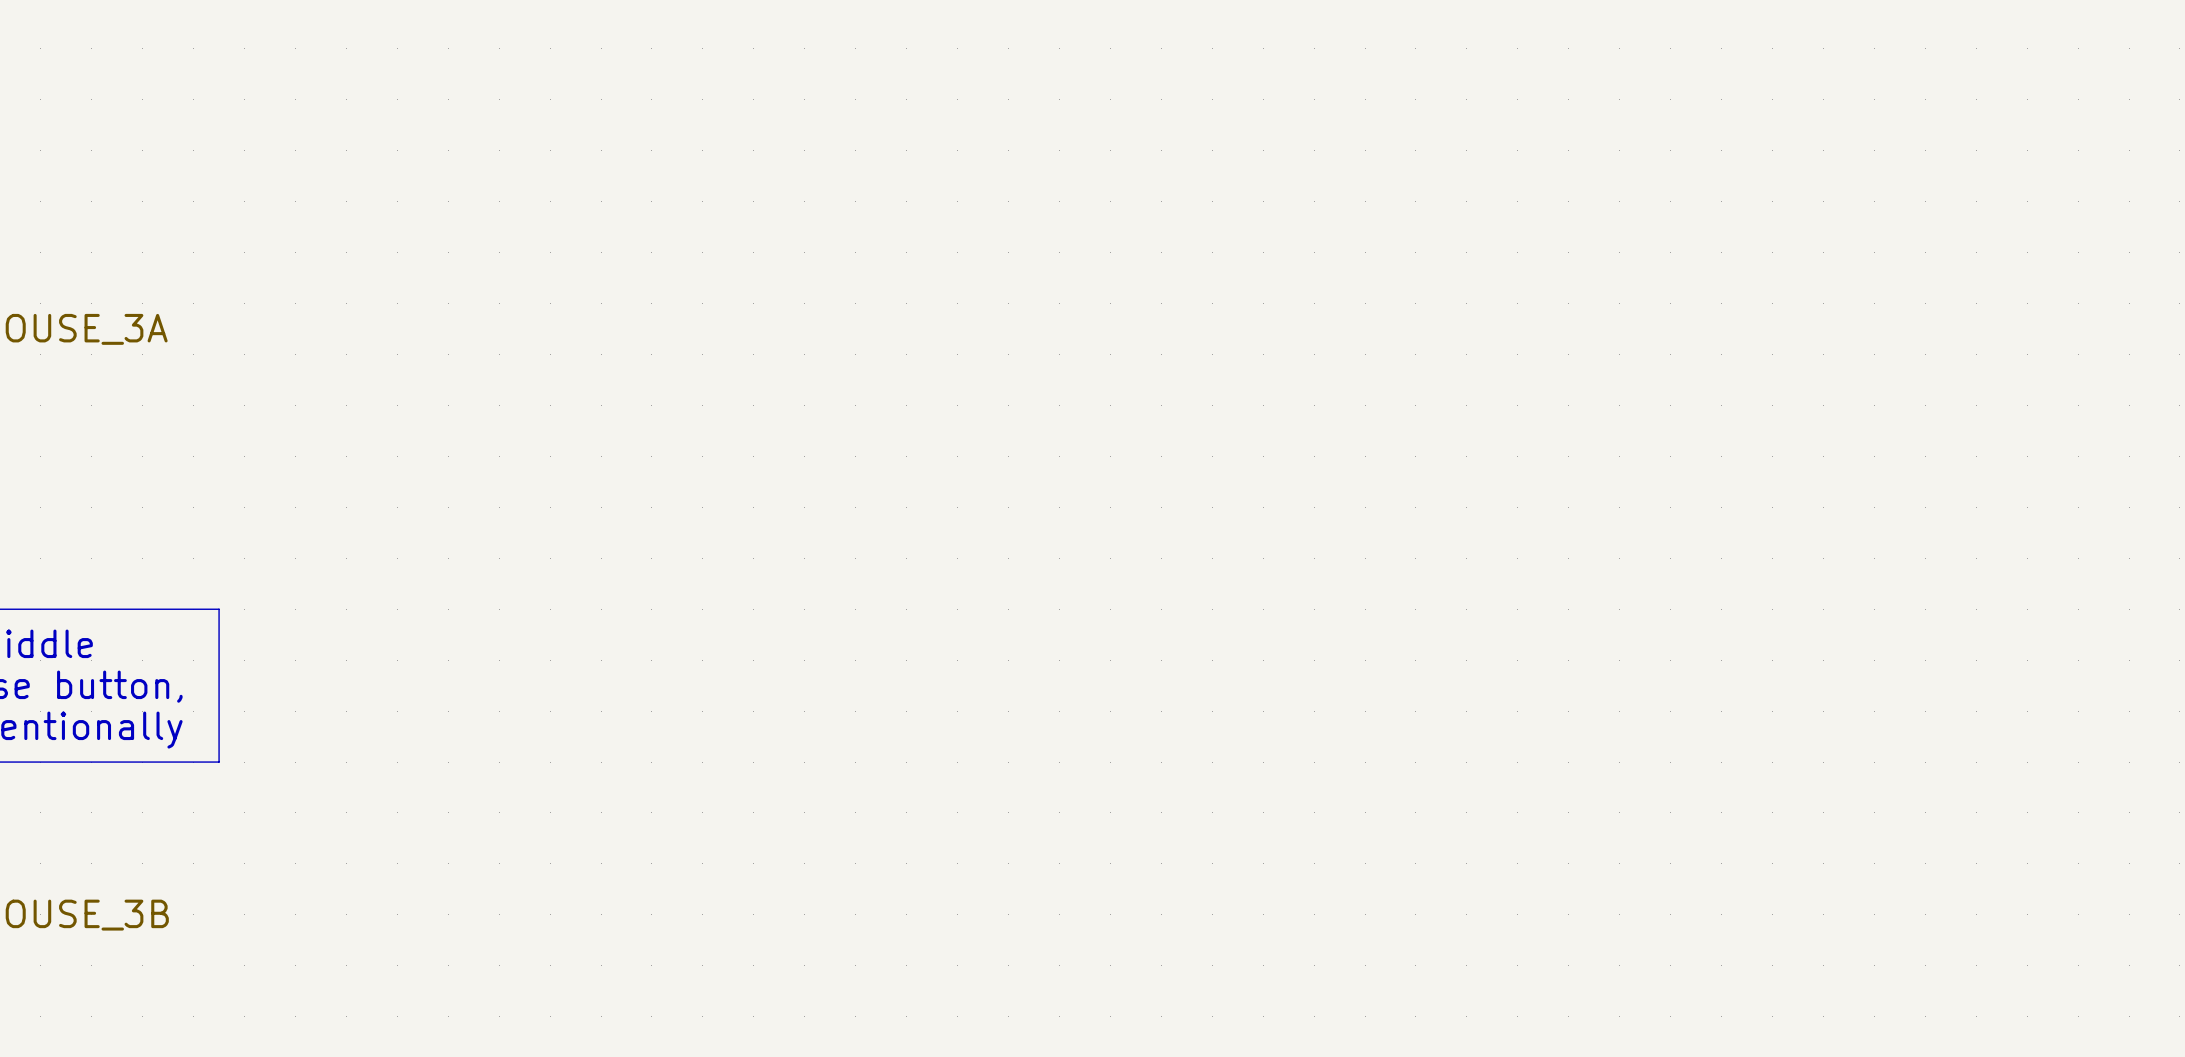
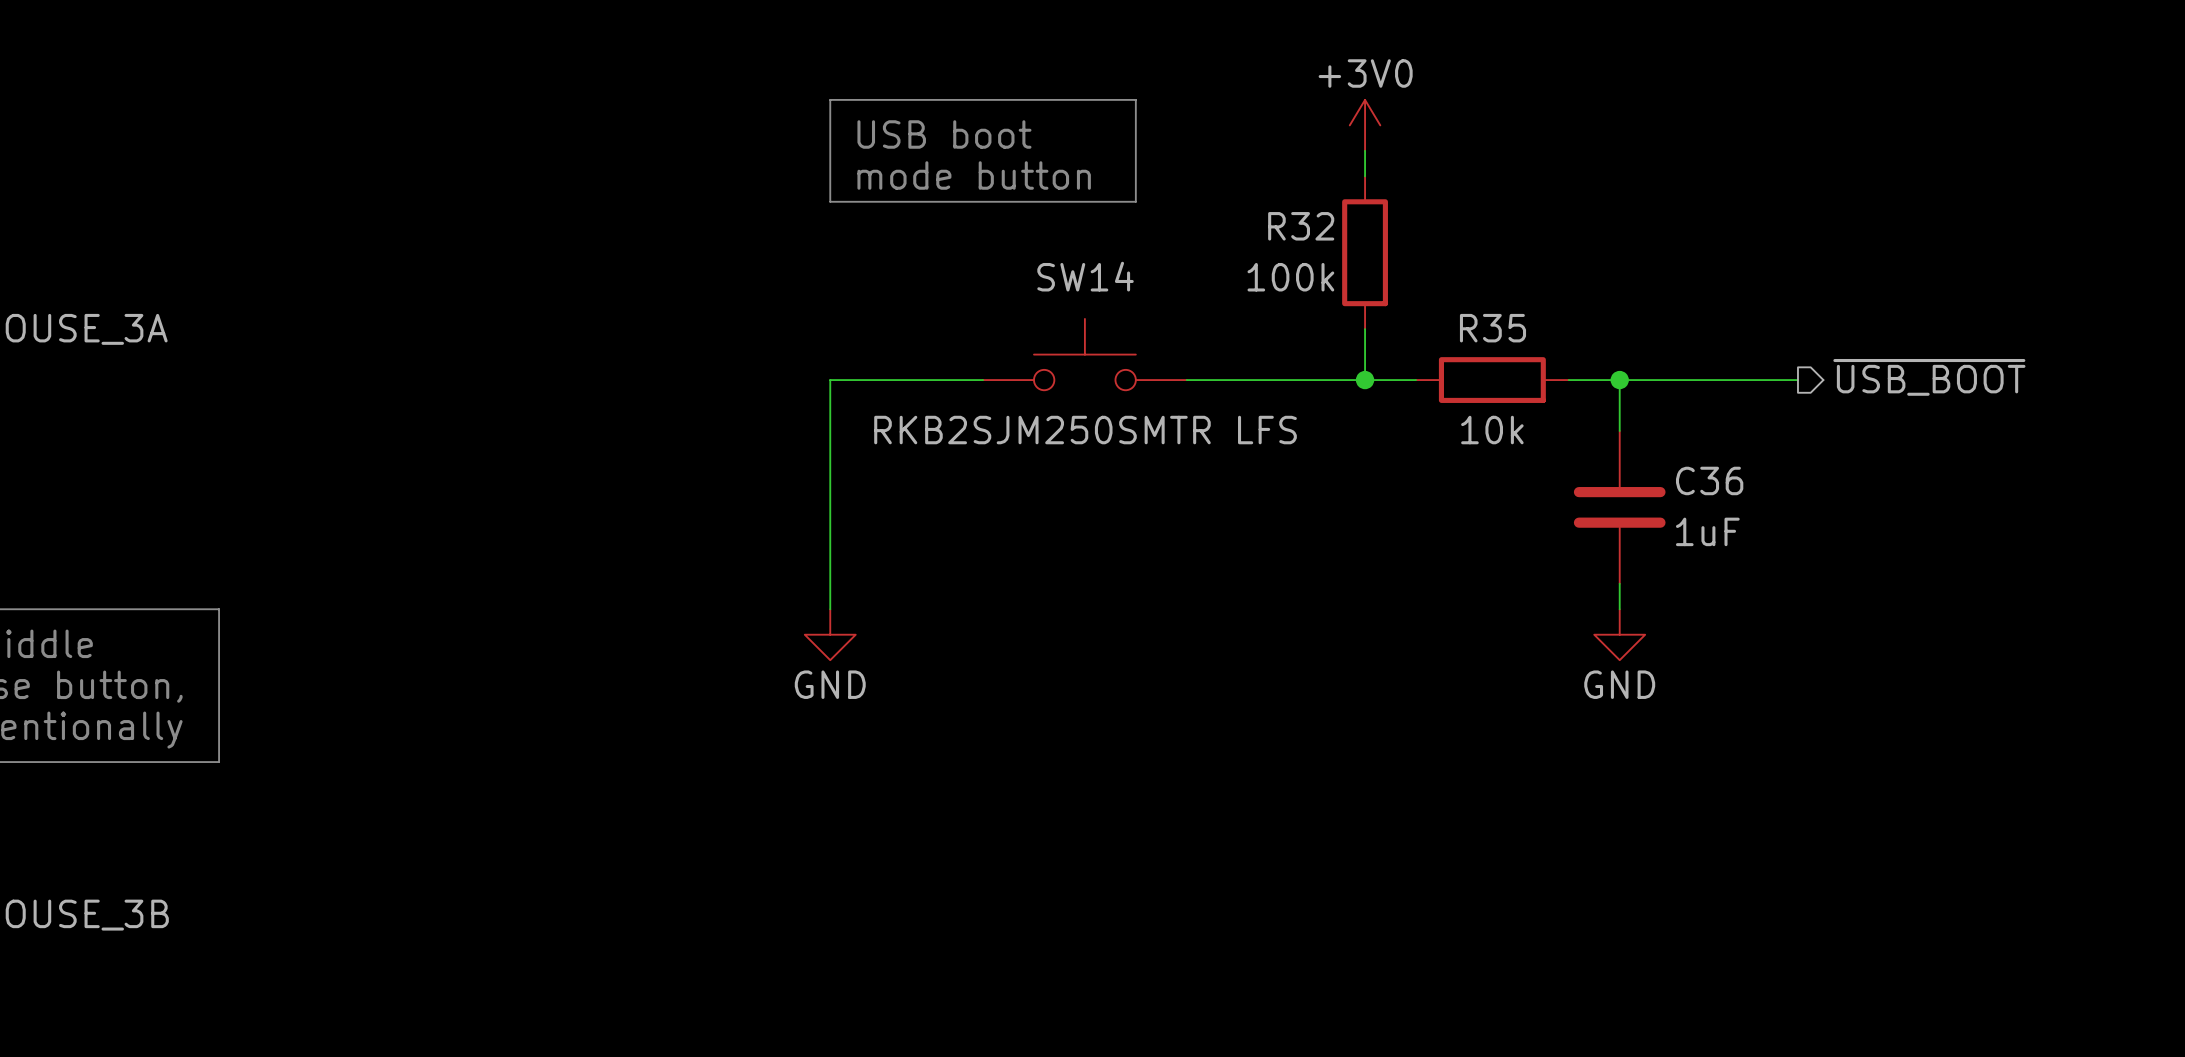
line: none -> (830, 99) (1135, 99) (1135, 201) (830, 201) (830, 99)
power symbol: none -> +3V0 (1365, 125)
text: none -> USB boot (944, 134)
wire: none -> (1365, 150) (1365, 176)
text: none -> mode button (974, 175)
R32: none -> 100k (1365, 252)
wire: none -> (1365, 329) (1365, 380)
SW14: none -> RKB2SJM250SMTR LFS (1084, 354)
hierarchical label: none -> ~{USB_BOOT} (1929, 377)
wire: none -> (983, 380) (830, 380) (830, 609)
wire: none -> (1186, 380) (1415, 380)
junction: none -> (1365, 380)
R35: none -> 10k (1492, 380)
wire: none -> (1568, 380) (1797, 380)
wire: none -> (1619, 380) (1619, 430)
junction: none -> (1619, 380)
C36: none -> 1uF (1619, 507)
wire: none -> (1619, 583) (1619, 609)
power symbol: none -> GND (830, 634)
power symbol: none -> GND (1619, 634)

